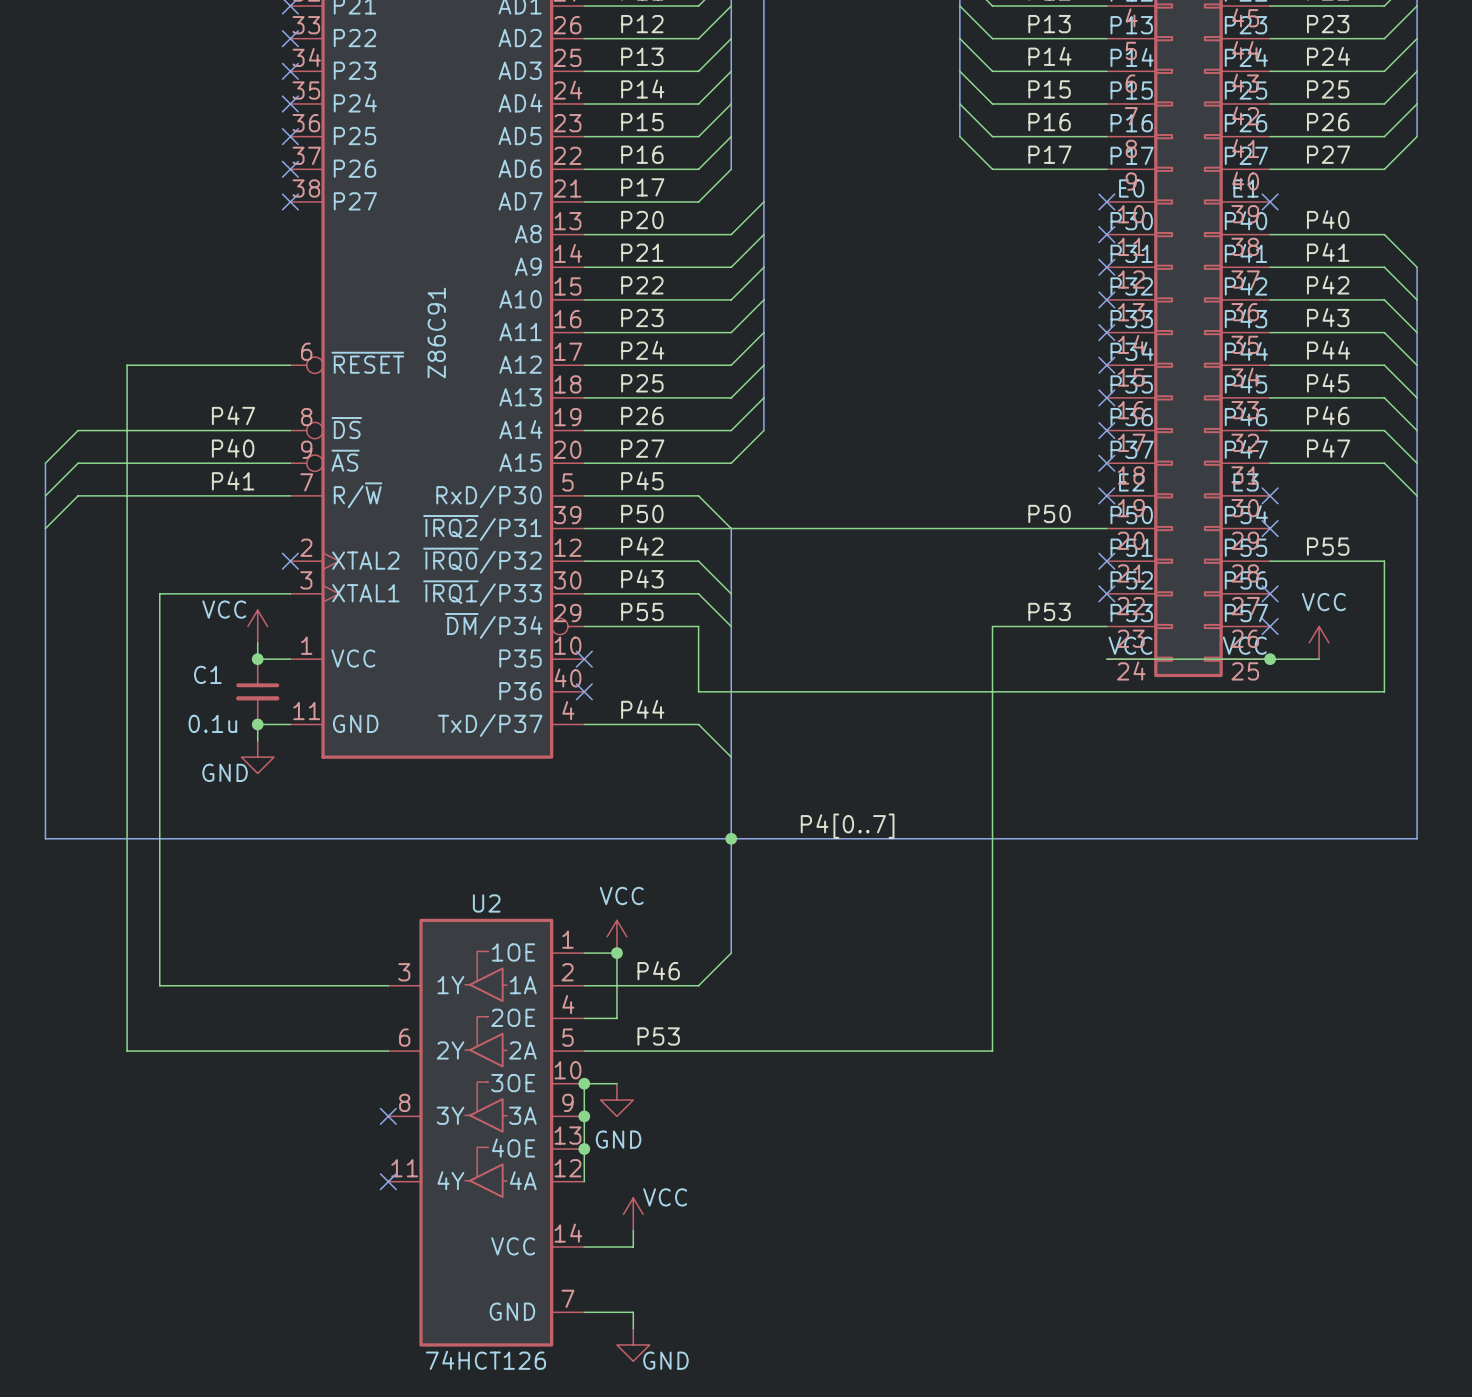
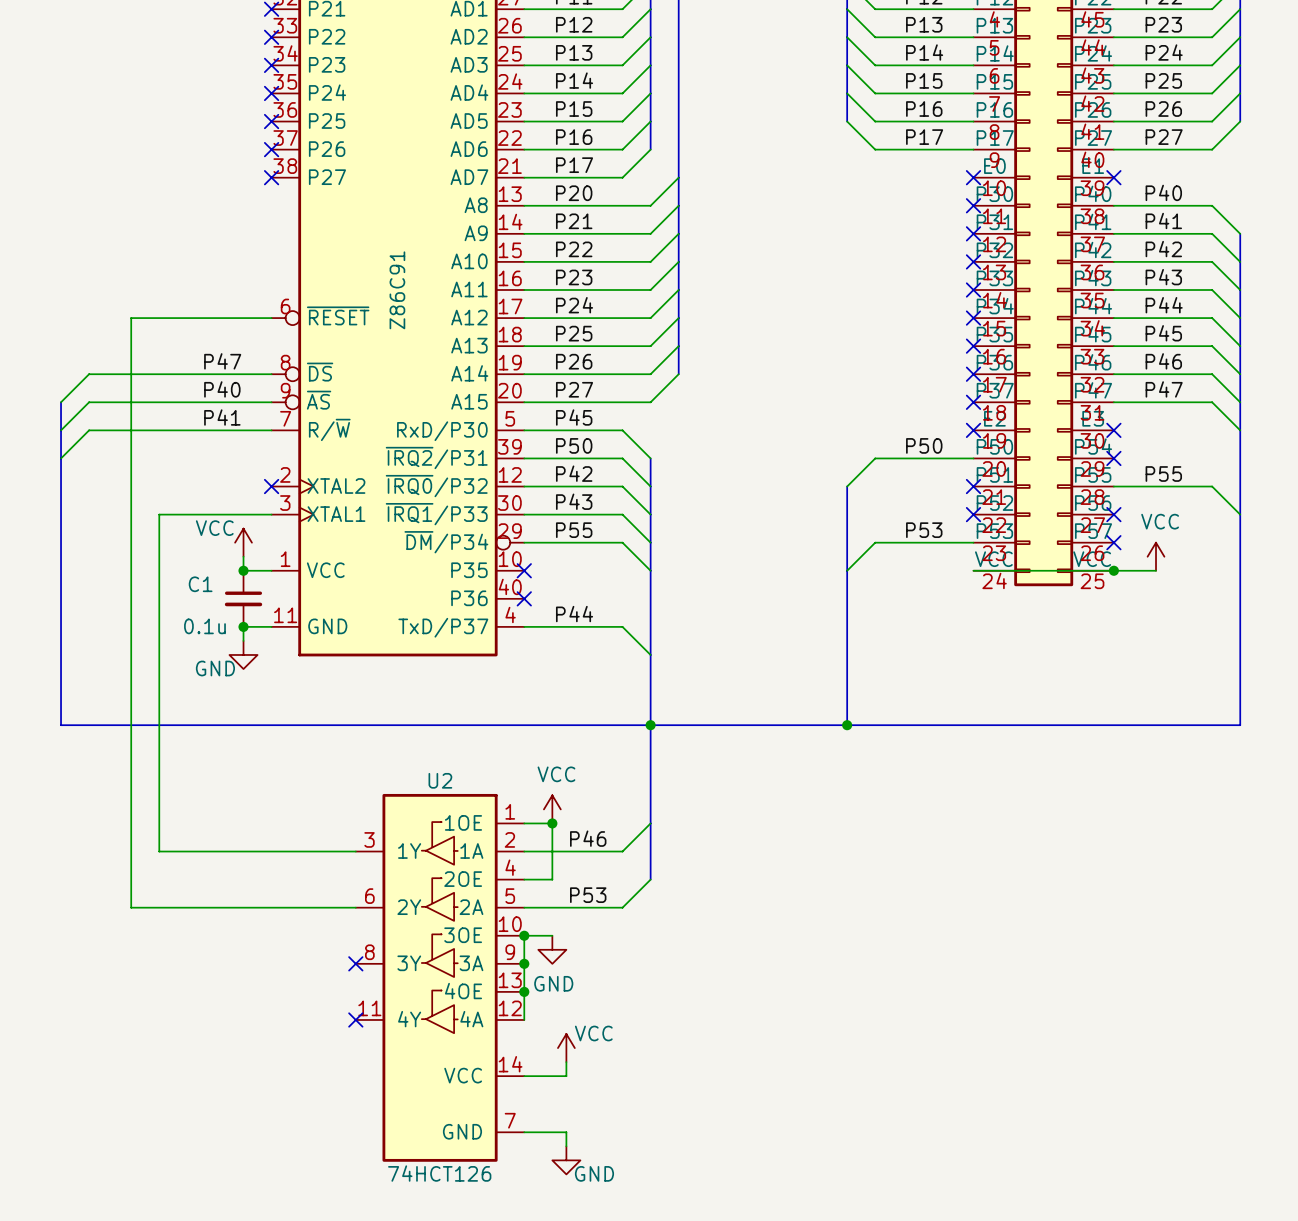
wire: (698, 528) (992, 528) -> (622, 458) (650, 486)
wire: none -> (875, 458) (847, 486)
bus: none -> (847, 486) (847, 725)
wire: (1384, 561) (1384, 691) (698, 691) (698, 626) -> (650, 570) (622, 542)
wire: none -> (1212, 486) (1240, 514)
wire: (992, 626) (992, 1051) (698, 1051) -> (875, 542) (847, 570)
label: P4[0..7] (847, 826) -> none
junction: none -> (847, 725)
bus: none -> (650, 823) (650, 879)
wire: none -> (650, 879) (622, 907)

